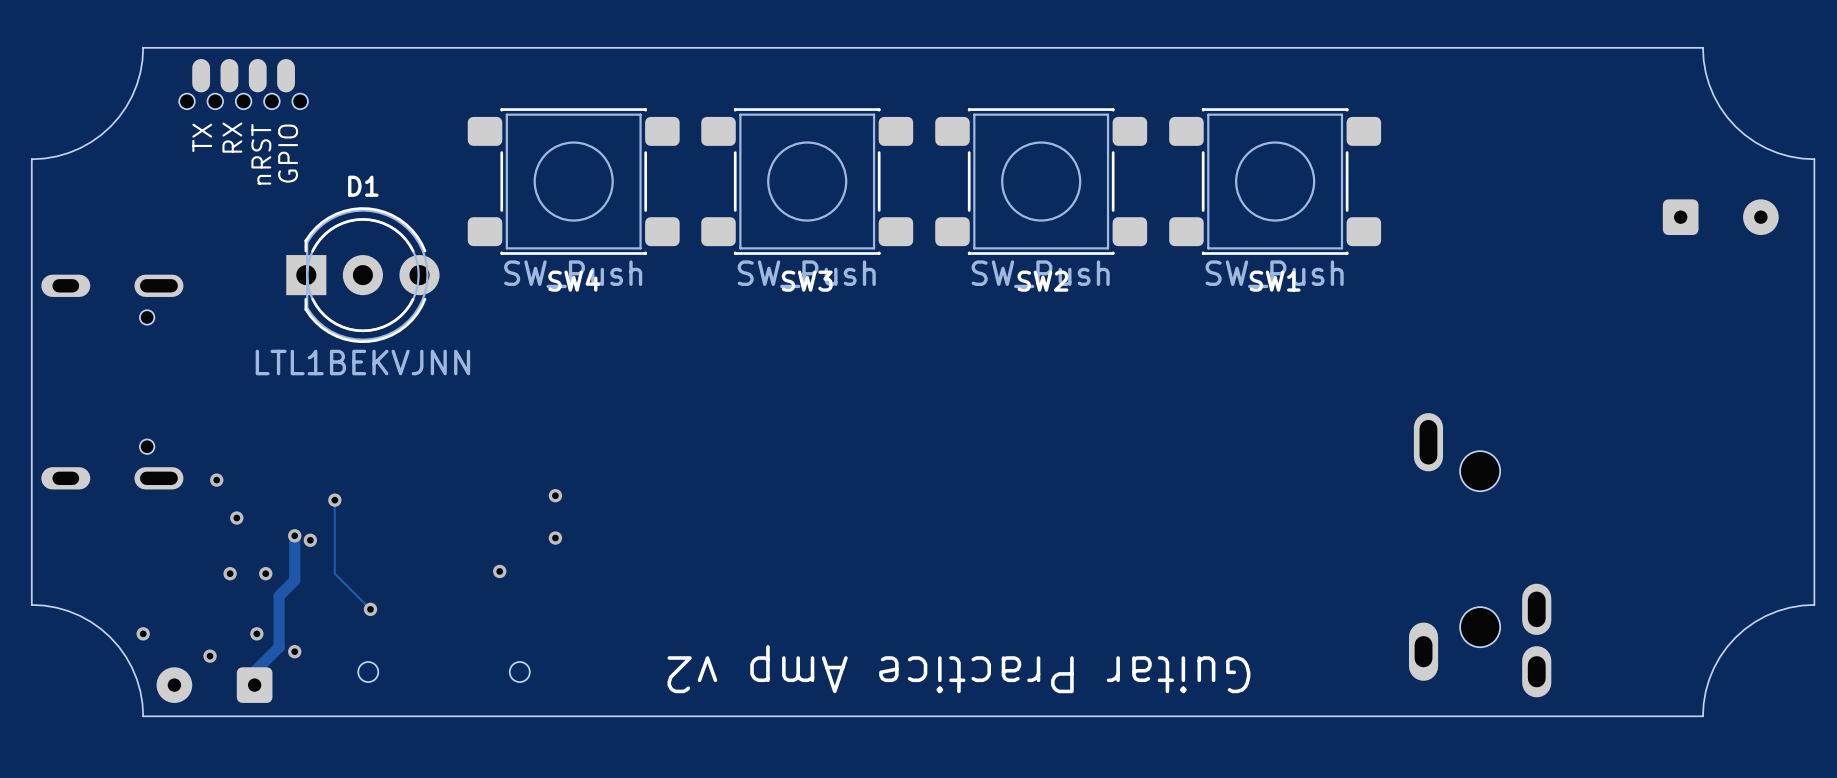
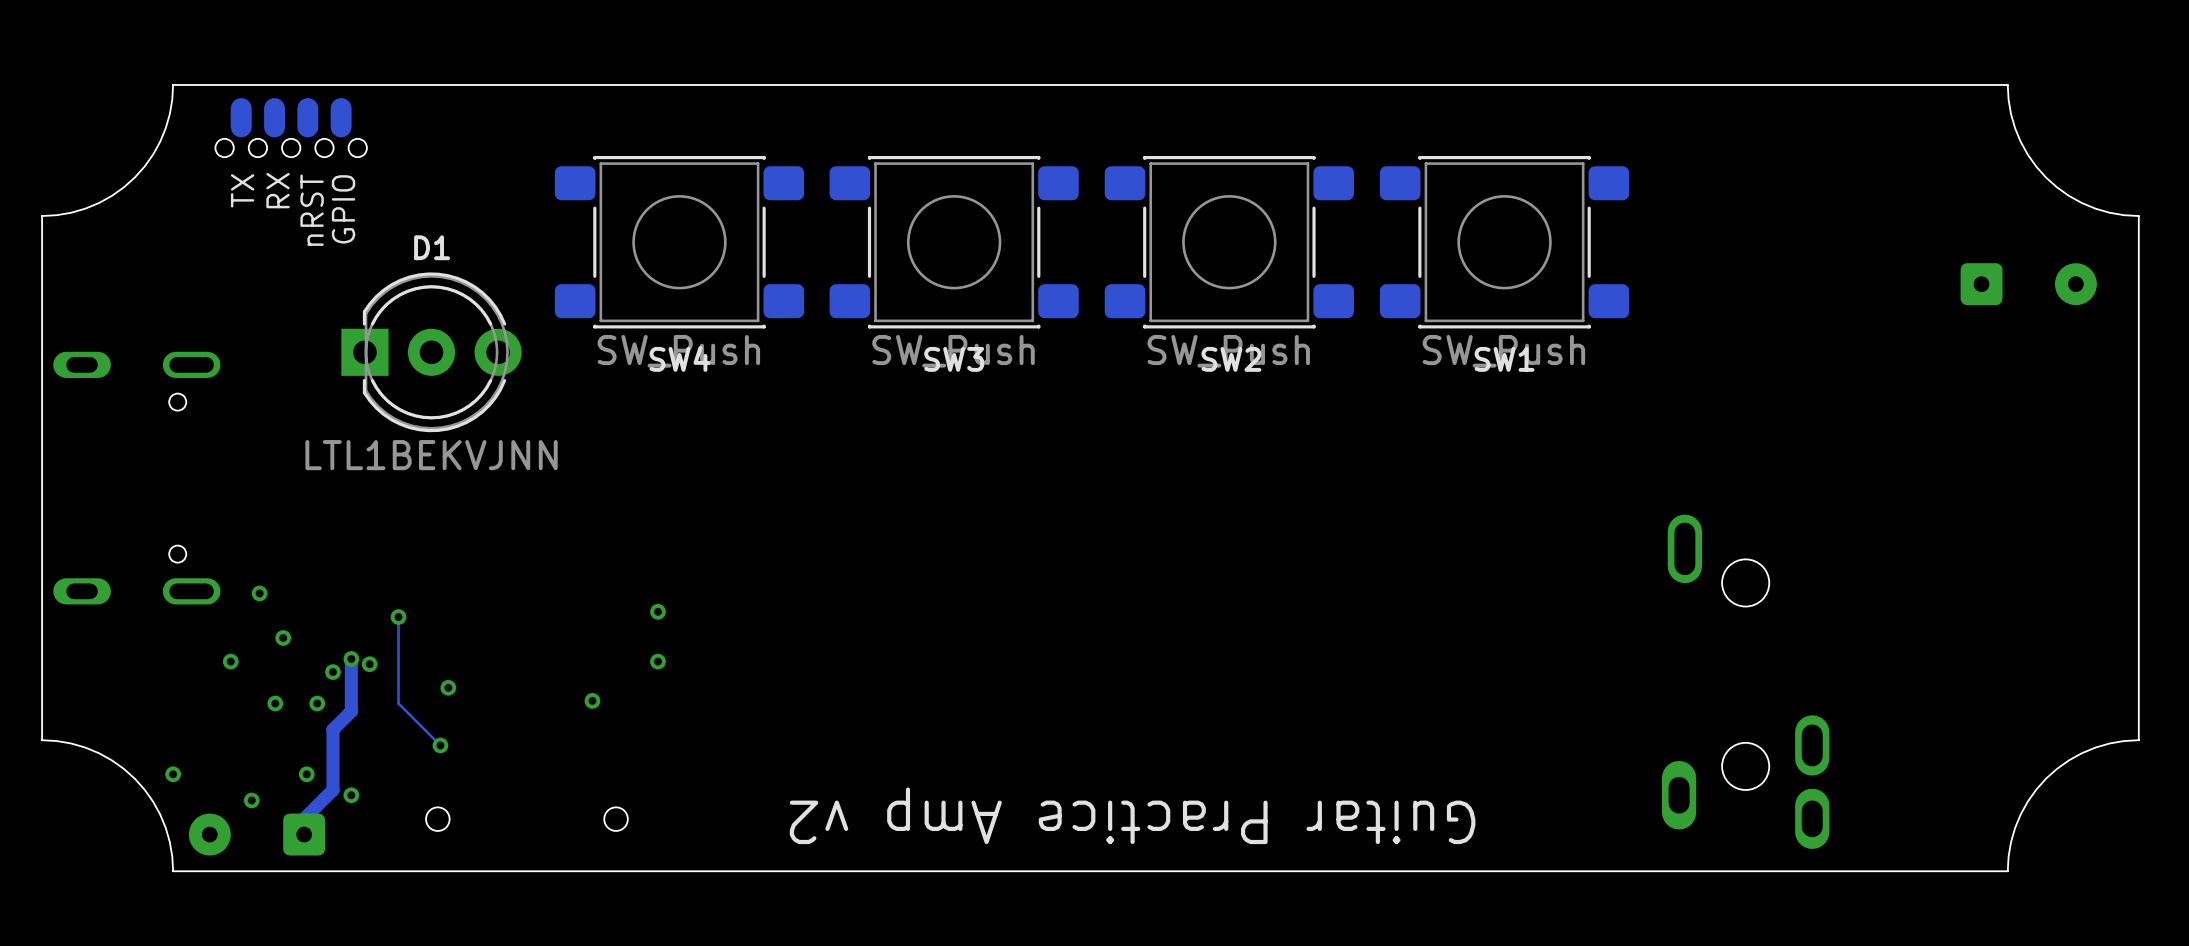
via: none -> (230, 661)
via: none -> (332, 672)
via: none -> (448, 687)

